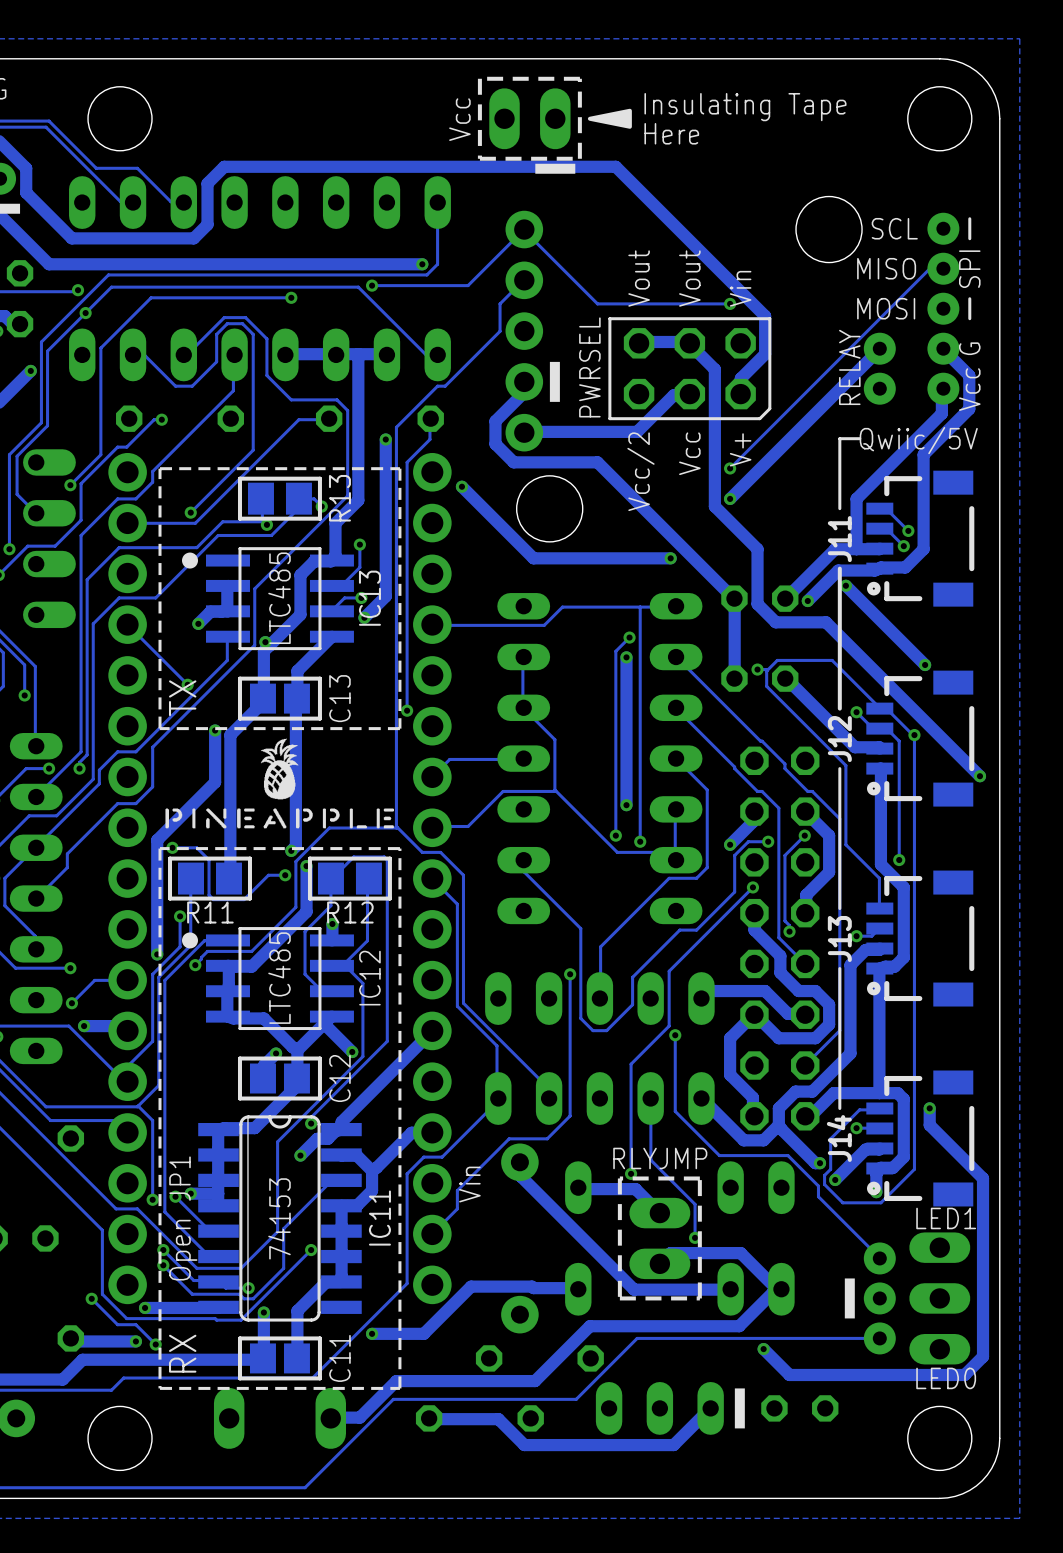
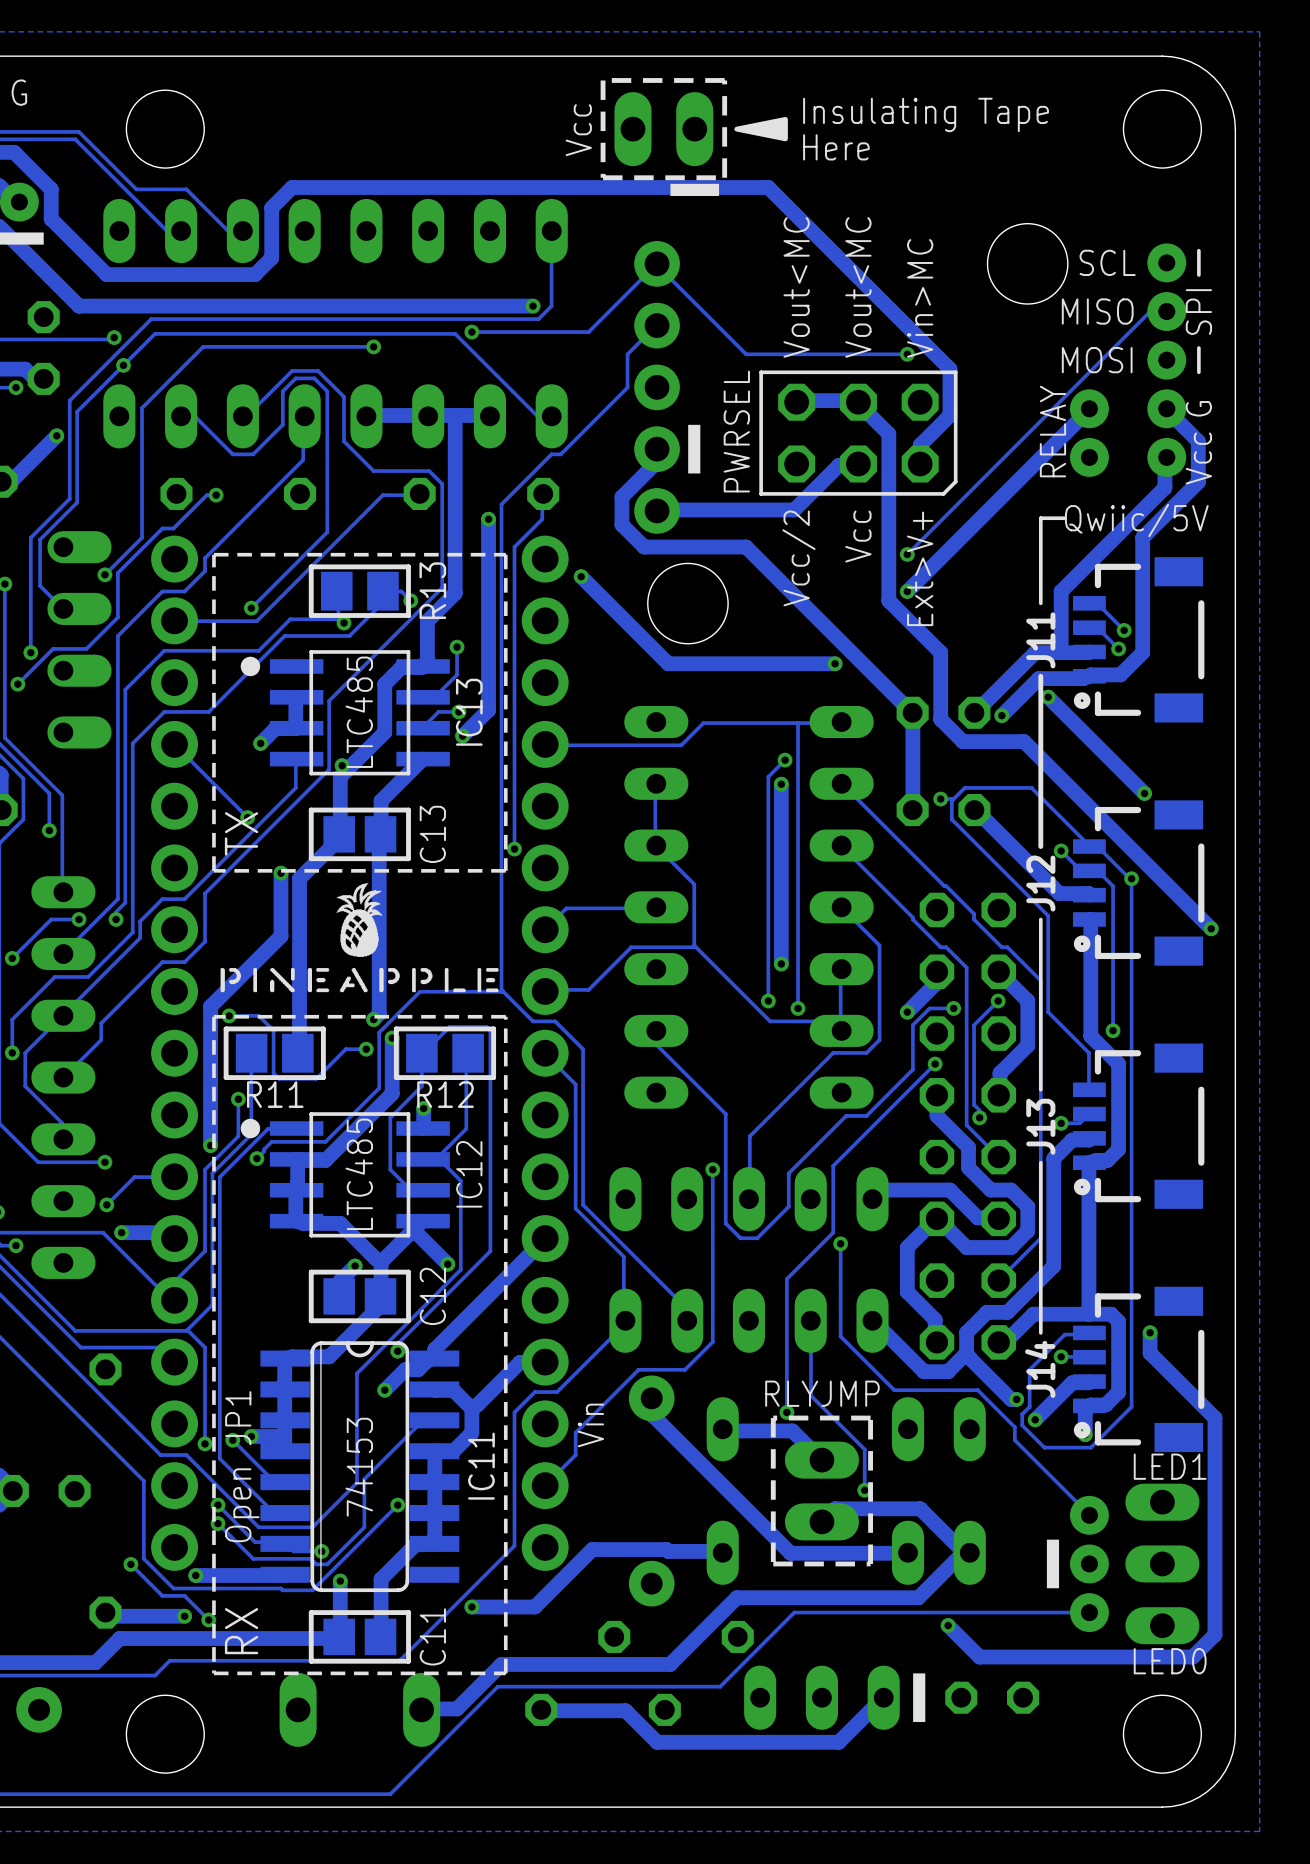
text: Vout (639, 278) -> Vout<MC (796, 287)
text: Vout (689, 278) -> Vout<MC (858, 287)
text: Vin (740, 288) -> Vin>MC (920, 298)
text: V+ (740, 449) -> Ext>V+ (920, 568)

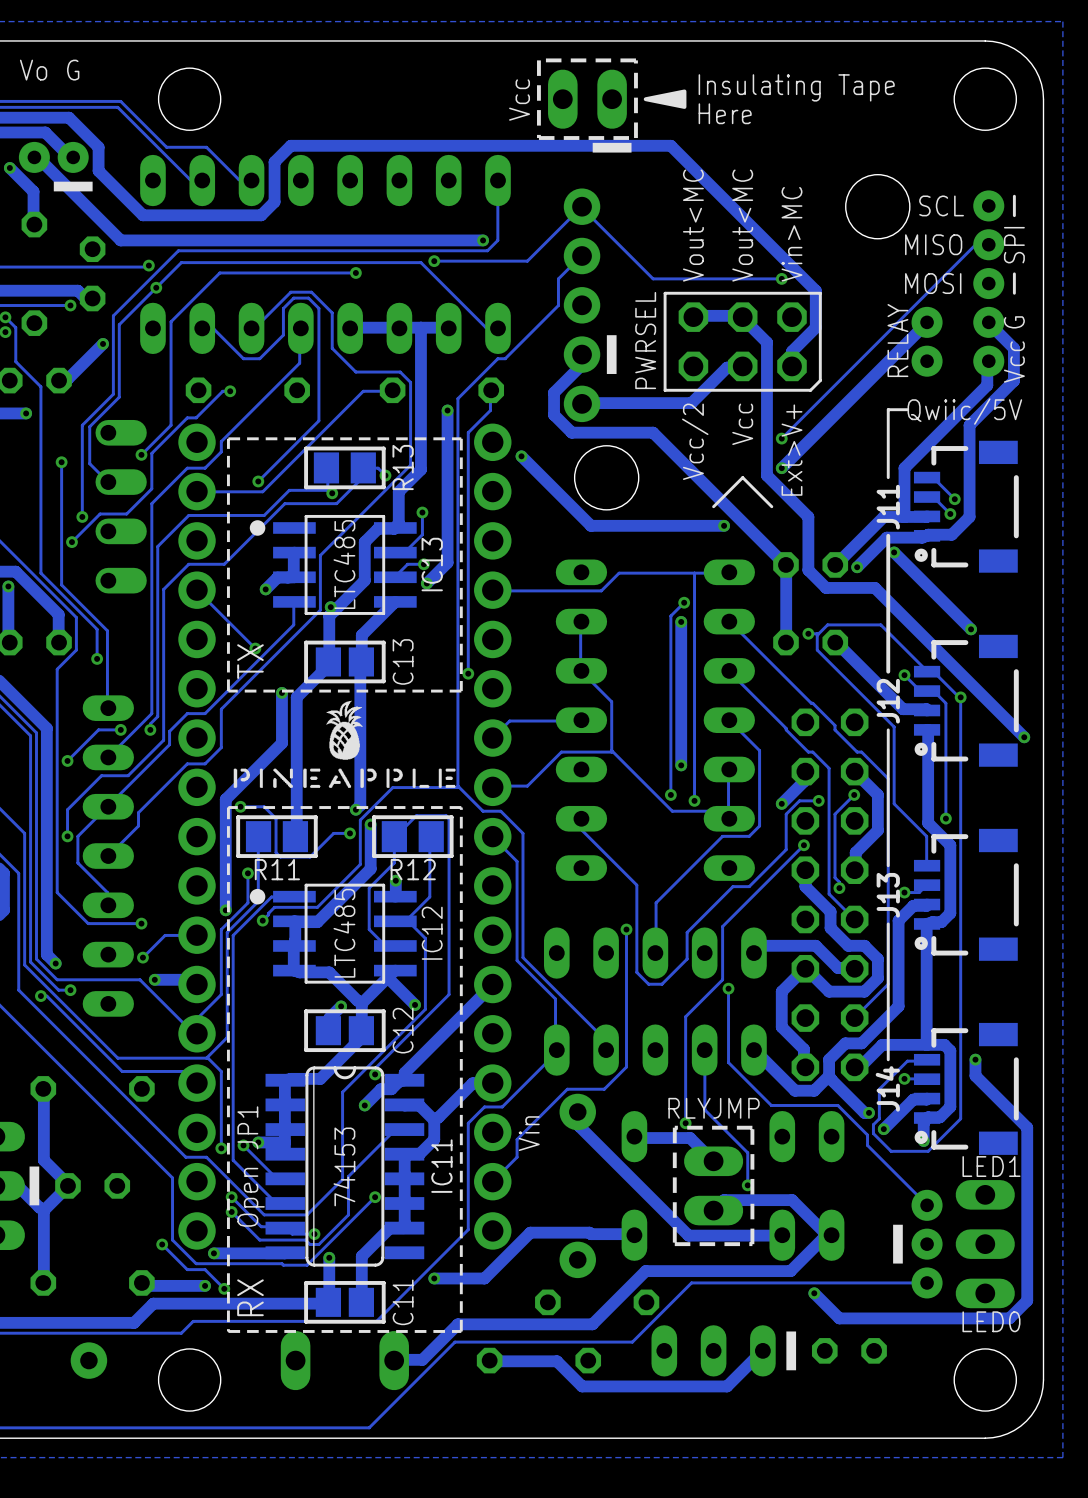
line: none -> (771, 506) (742, 477) (713, 506)

